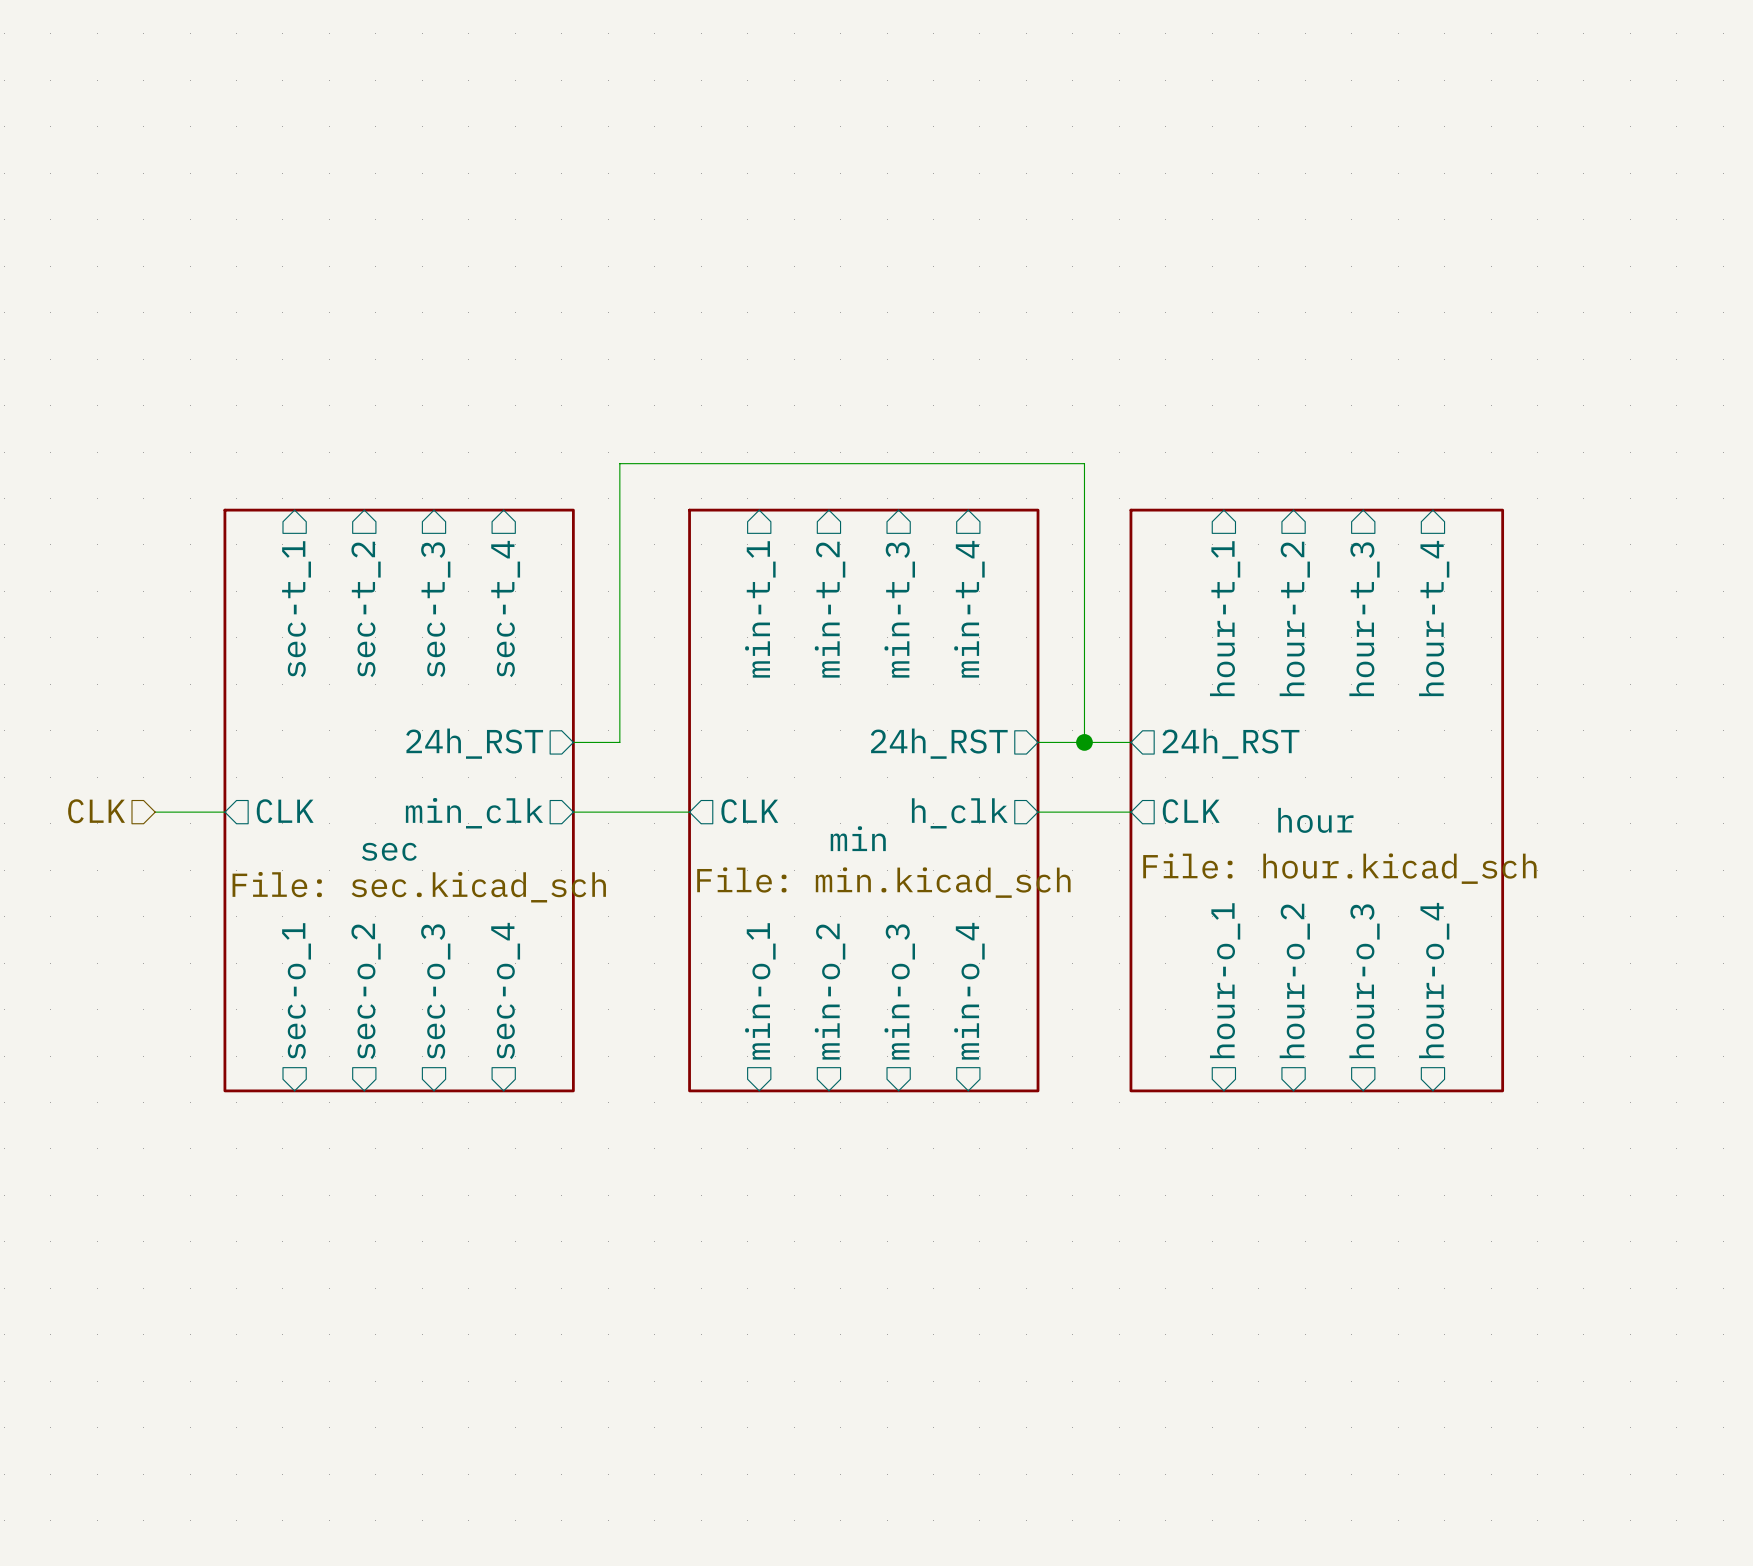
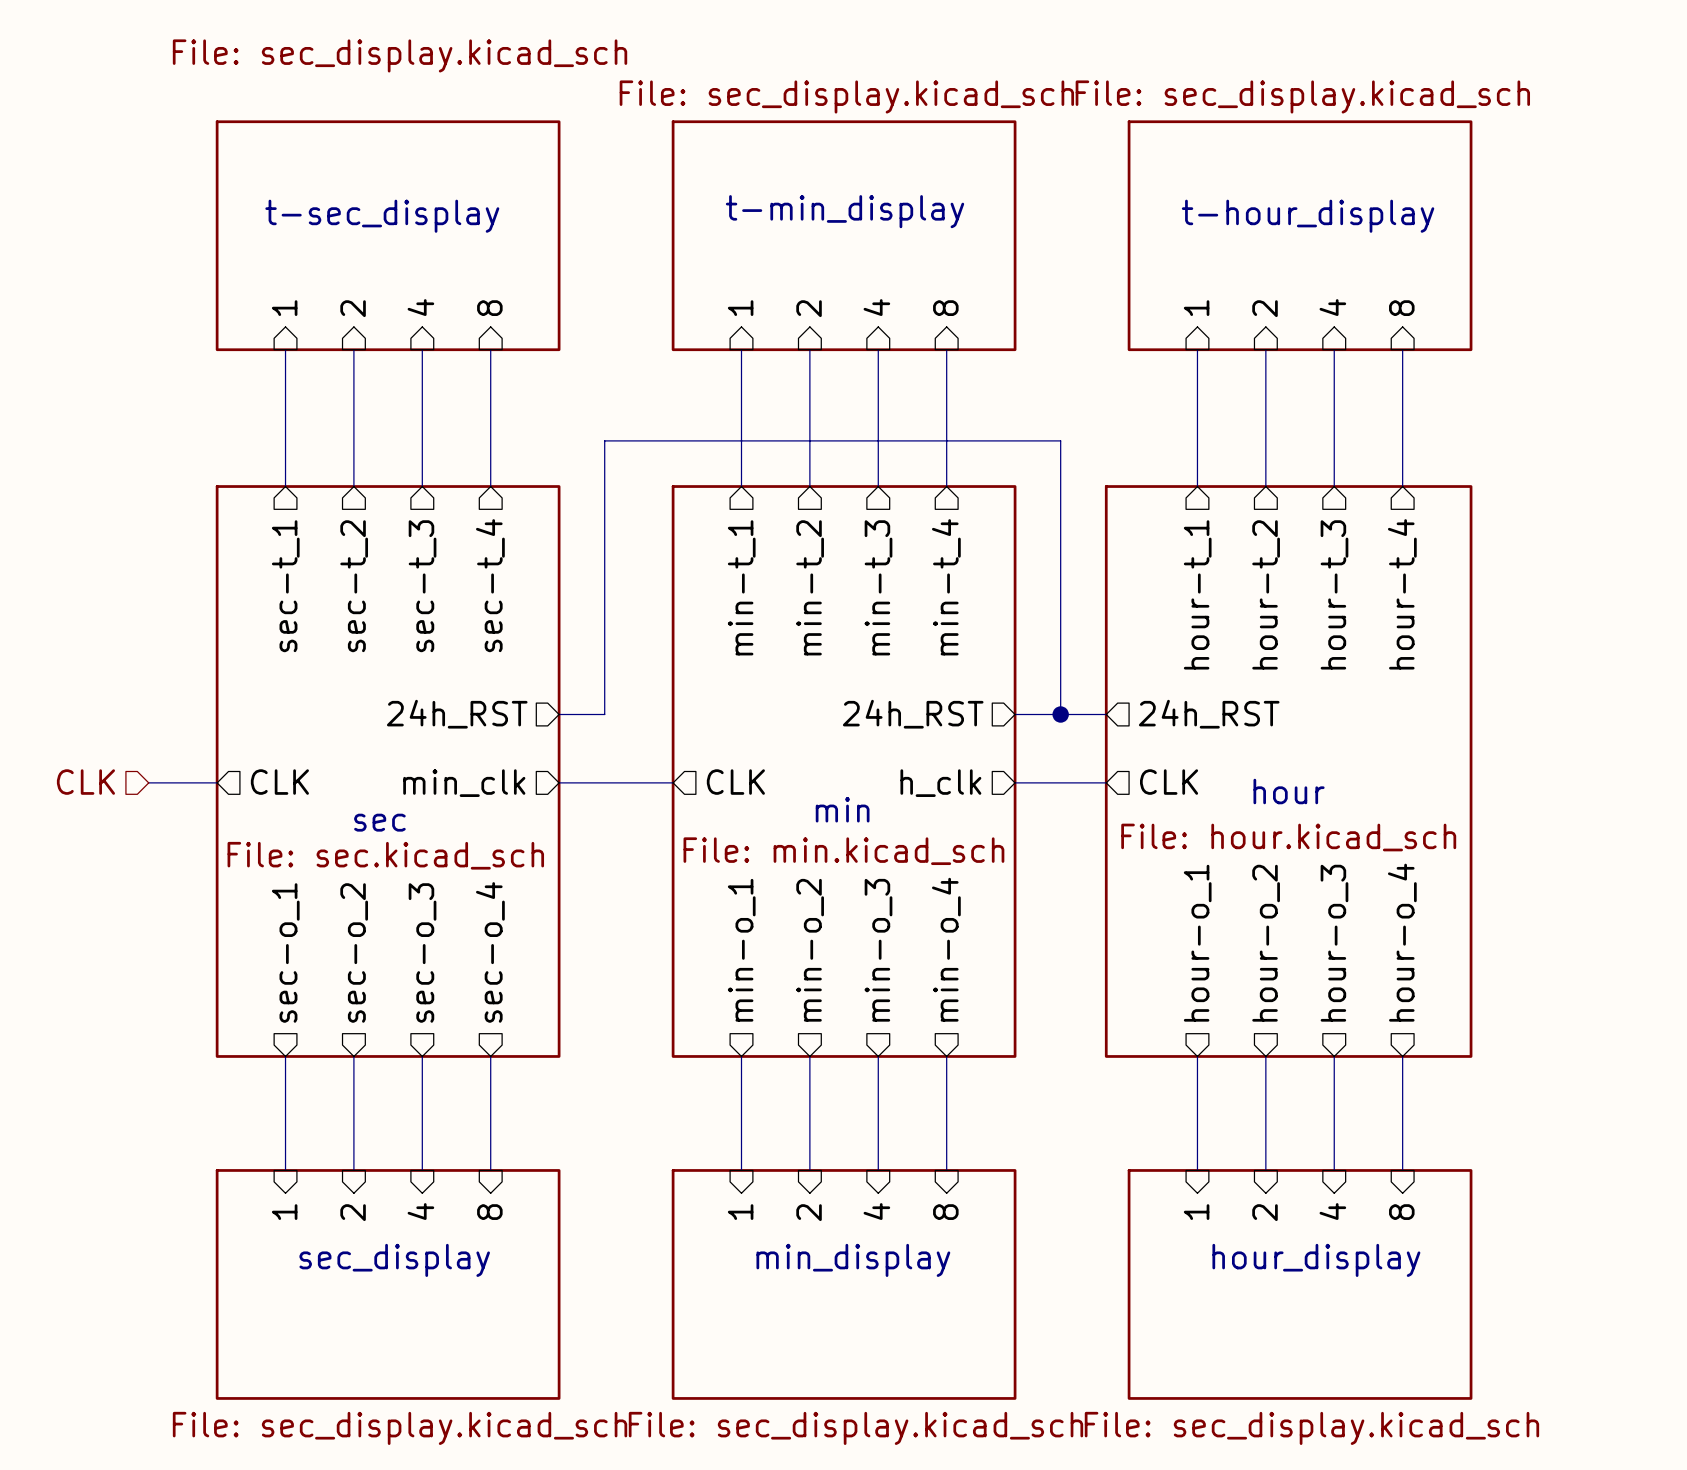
sheet t-sec_display: none -> File: sec_display.kicad_sch (388, 235)
sheet t-min_display: none -> File: sec_display.kicad_sch (844, 235)
sheet t-hour_display: none -> File: sec_display.kicad_sch (1300, 235)
sheet pin: none -> 1 (284, 308)
sheet pin: none -> 2 (353, 308)
sheet pin: none -> 4 (420, 307)
sheet pin: none -> 8 (489, 308)
sheet pin: none -> 1 (740, 308)
sheet pin: none -> 2 (809, 308)
sheet pin: none -> 4 (876, 307)
sheet pin: none -> 8 (945, 308)
sheet pin: none -> 1 (1196, 308)
sheet pin: none -> 2 (1265, 308)
sheet pin: none -> 4 (1332, 307)
sheet pin: none -> 8 (1401, 308)
wire: none -> (285, 349) (285, 486)
wire: none -> (353, 349) (353, 486)
wire: none -> (422, 349) (422, 486)
wire: none -> (490, 349) (490, 486)
wire: none -> (741, 349) (741, 486)
wire: none -> (809, 349) (809, 486)
wire: none -> (878, 349) (878, 486)
wire: none -> (946, 349) (946, 486)
wire: none -> (1197, 349) (1197, 486)
wire: none -> (1265, 349) (1265, 486)
wire: none -> (1334, 349) (1334, 486)
wire: none -> (1402, 349) (1402, 486)
wire: none -> (285, 1056) (285, 1170)
wire: none -> (353, 1056) (353, 1170)
wire: none -> (422, 1056) (422, 1170)
wire: none -> (490, 1056) (490, 1170)
wire: none -> (741, 1056) (741, 1170)
wire: none -> (809, 1056) (809, 1170)
wire: none -> (878, 1056) (878, 1170)
wire: none -> (946, 1056) (946, 1170)
wire: none -> (1197, 1056) (1197, 1170)
wire: none -> (1265, 1056) (1265, 1170)
wire: none -> (1334, 1056) (1334, 1170)
wire: none -> (1402, 1056) (1402, 1170)
sheet pin: none -> 1 (284, 1212)
sheet pin: none -> 2 (353, 1212)
sheet pin: none -> 4 (420, 1211)
sheet pin: none -> 8 (489, 1212)
sheet pin: none -> 1 (740, 1212)
sheet pin: none -> 2 (809, 1212)
sheet pin: none -> 4 (876, 1211)
sheet pin: none -> 8 (945, 1212)
sheet pin: none -> 1 (1196, 1212)
sheet pin: none -> 2 (1265, 1212)
sheet pin: none -> 4 (1332, 1211)
sheet pin: none -> 8 (1401, 1212)
sheet sec_display: none -> File: sec_display.kicad_sch (388, 1284)
sheet min_display: none -> File: sec_display.kicad_sch (844, 1284)
sheet hour_display: none -> File: sec_display.kicad_sch (1300, 1284)

